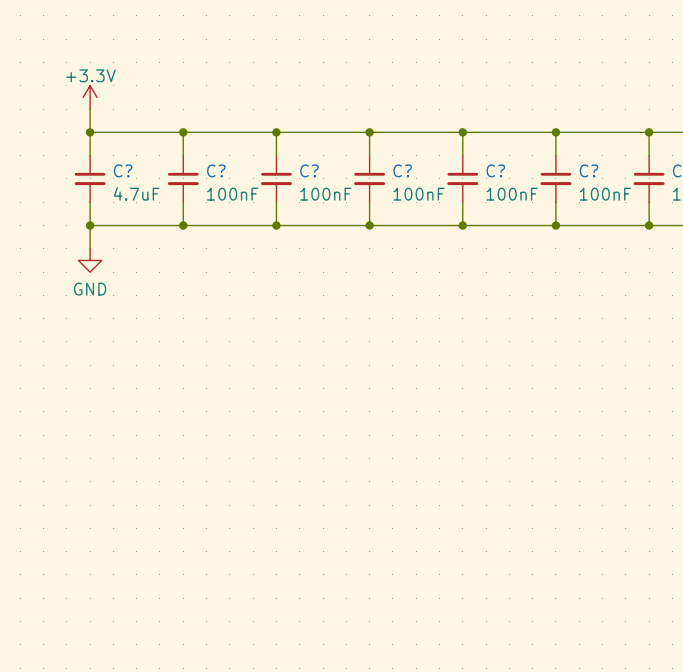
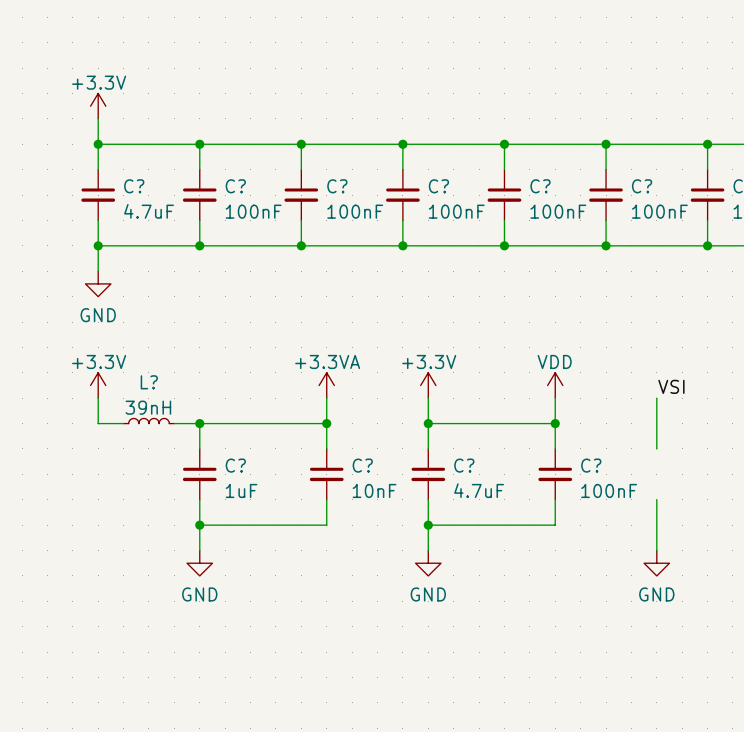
power symbol: none -> +3.3V (98, 385)
power symbol: none -> +3.3VA (326, 385)
power symbol: none -> +3.3V (428, 385)
power symbol: none -> VDD (555, 385)
label: none -> VSI (671, 386)
wire: none -> (98, 398) (98, 423) (123, 423)
wire: none -> (326, 398) (326, 448)
wire: none -> (428, 398) (428, 448)
wire: none -> (555, 398) (555, 448)
wire: none -> (656, 398) (656, 448)
L?: none -> 39nH (148, 421)
wire: none -> (174, 423) (326, 423)
wire: none -> (199, 423) (199, 448)
junction: none -> (199, 423)
junction: none -> (326, 423)
wire: none -> (428, 423) (555, 423)
junction: none -> (428, 423)
junction: none -> (555, 423)
C?: none -> 1uF (199, 474)
C?: none -> 10nF (326, 474)
C?: none -> 4.7uF (428, 474)
C?: none -> 100nF (555, 474)
wire: none -> (199, 499) (199, 550)
wire: none -> (326, 499) (326, 525) (199, 525)
wire: none -> (428, 499) (428, 550)
wire: none -> (555, 499) (555, 525) (428, 525)
wire: none -> (656, 499) (656, 550)
junction: none -> (199, 525)
junction: none -> (428, 525)
power symbol: none -> GND (199, 563)
power symbol: none -> GND (428, 563)
power symbol: none -> GND (656, 563)

